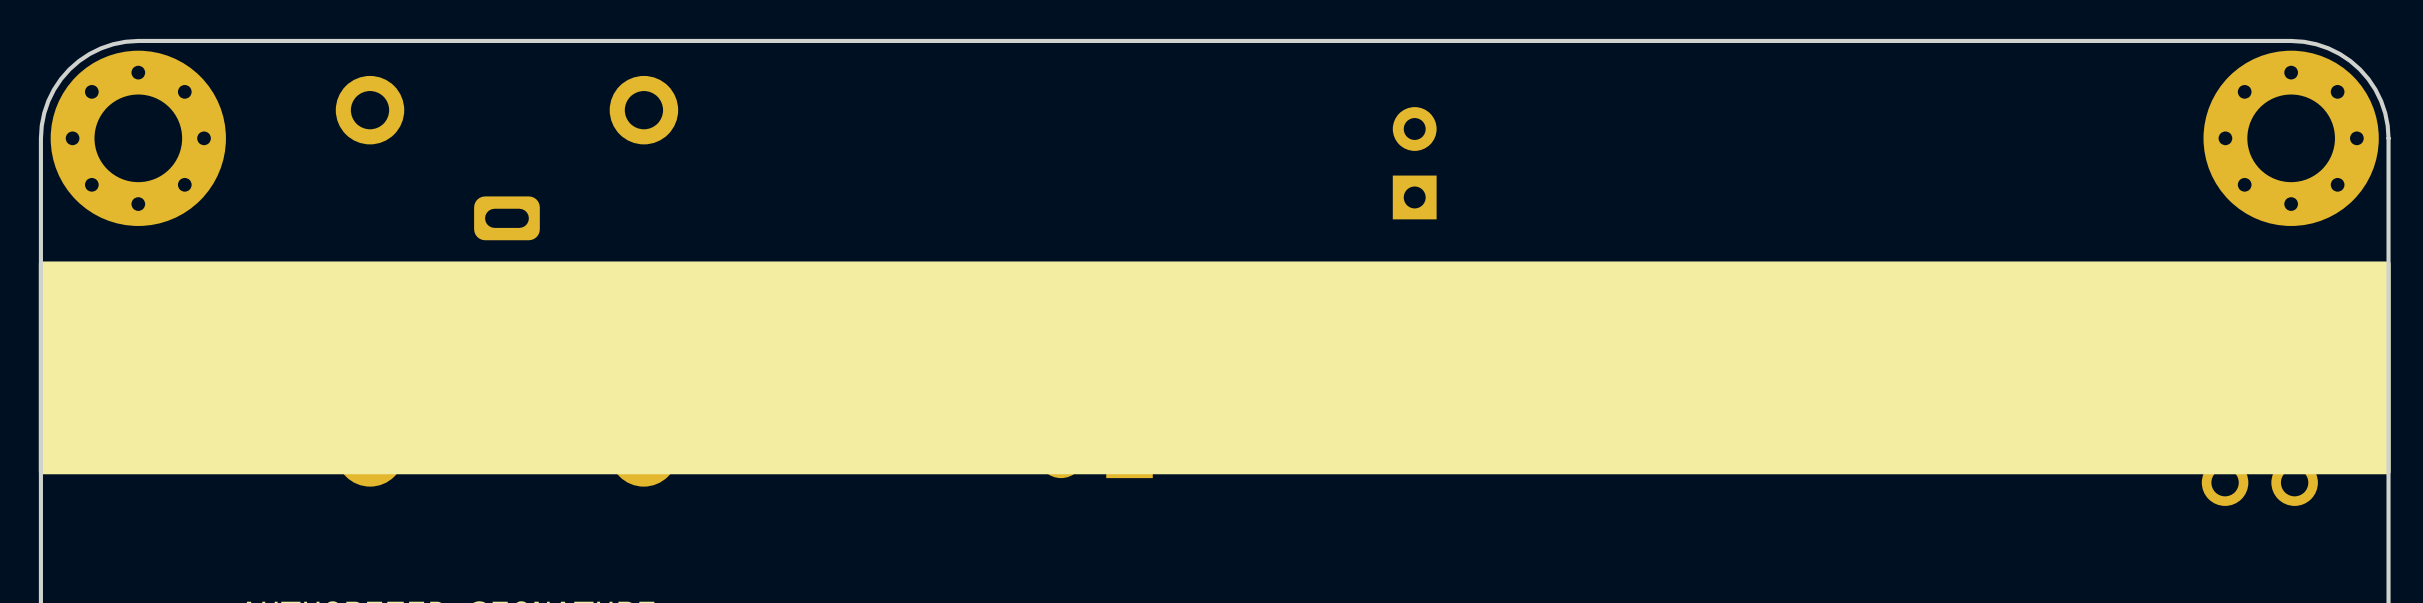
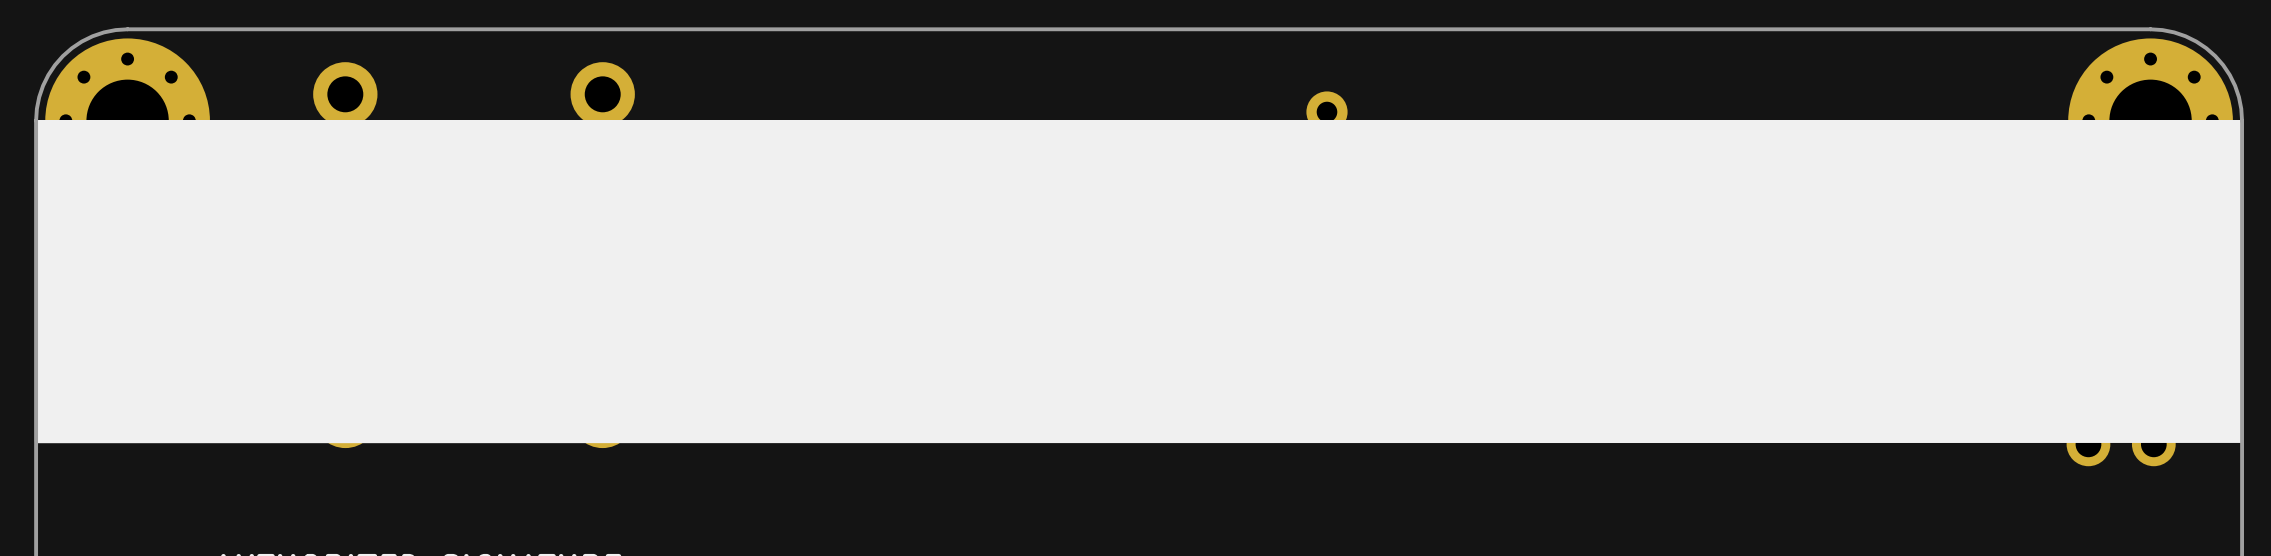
drawing: none -> [34, 120, 2244, 444]
drawing: [38, 261, 2391, 475] -> none

